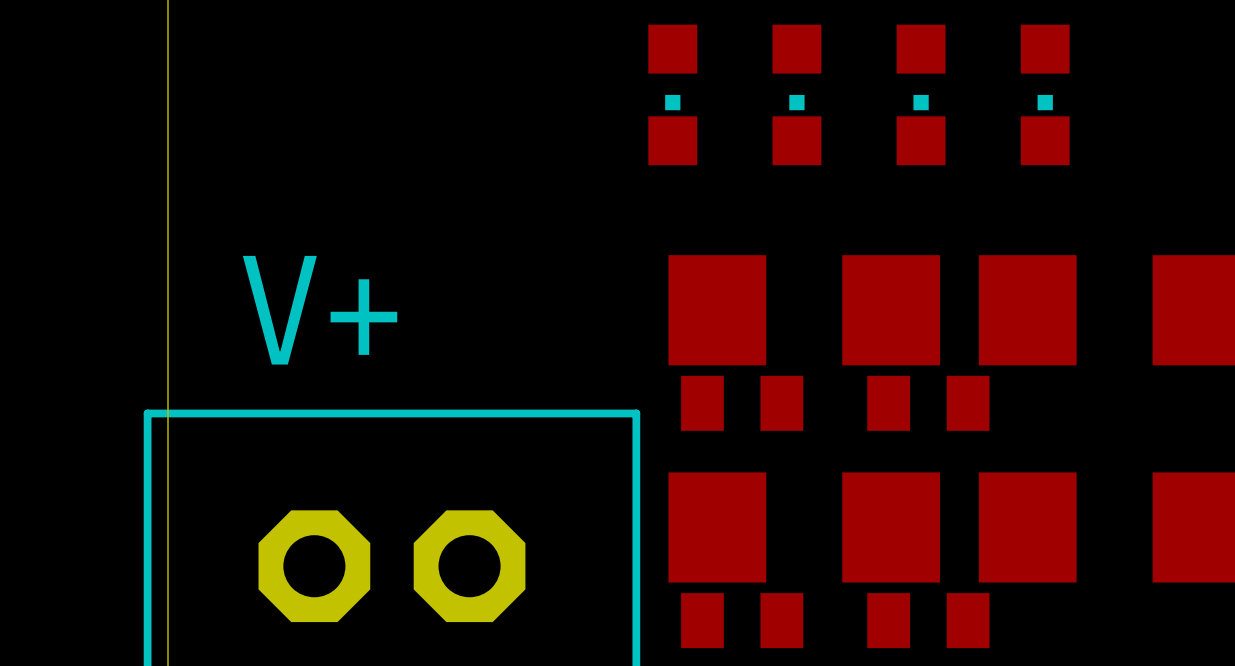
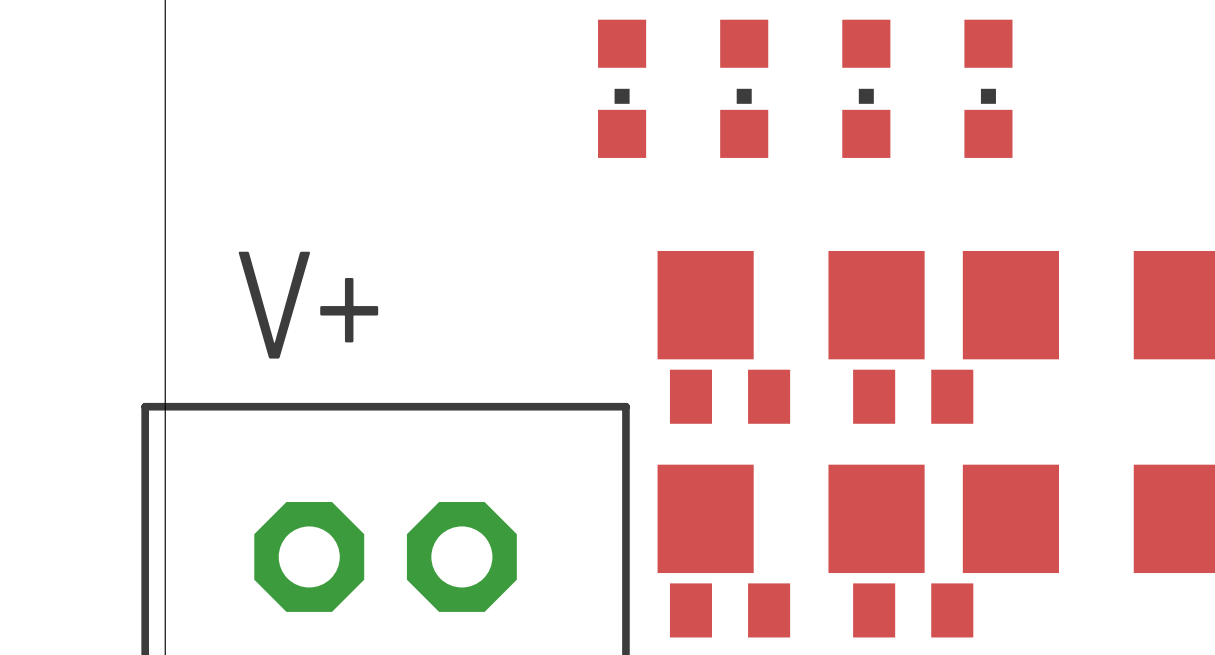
part position: (672, 94) -> (622, 88)
part position: (796, 94) -> (744, 88)
part position: (921, 94) -> (866, 88)
part position: (1045, 94) -> (988, 88)

